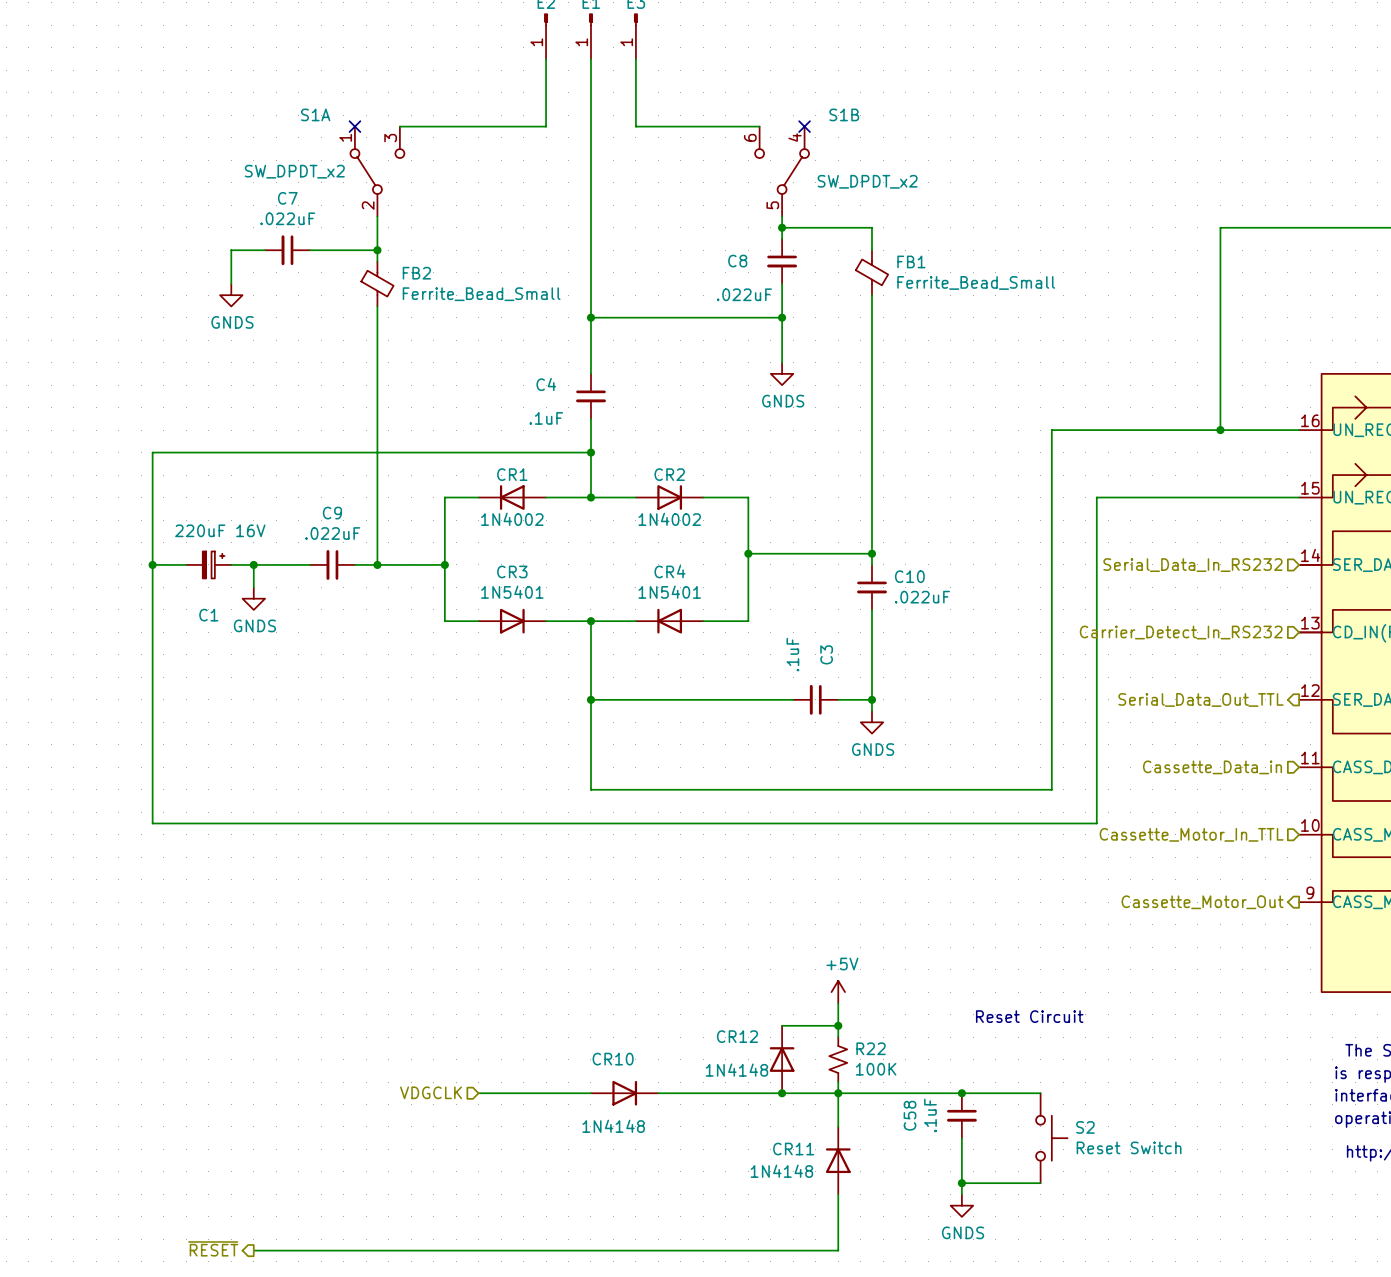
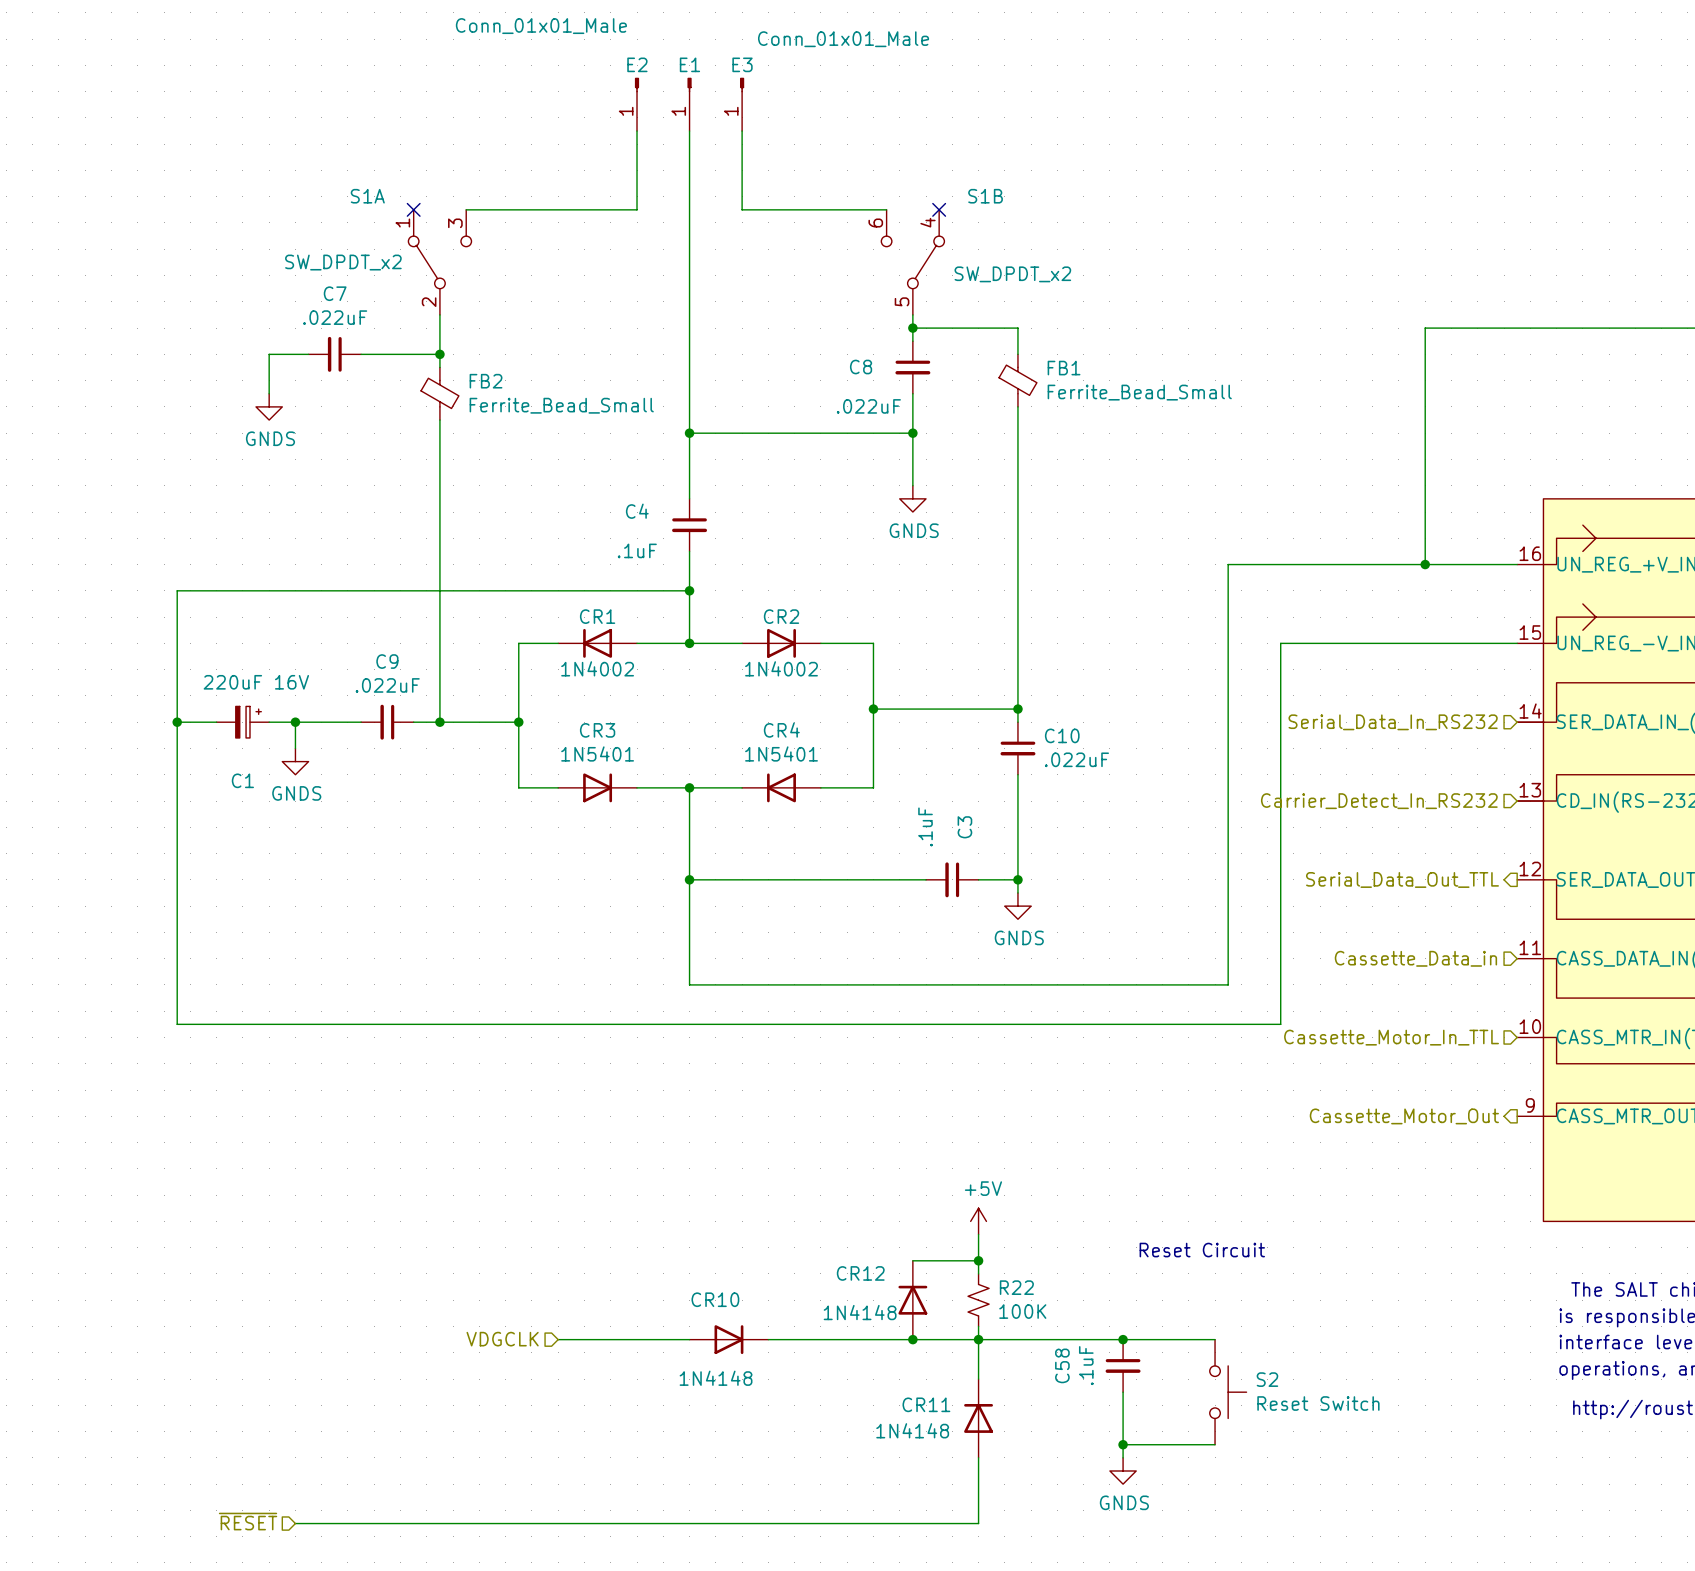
hierarchical label shape: output (213, 1248) -> input (248, 1521)

